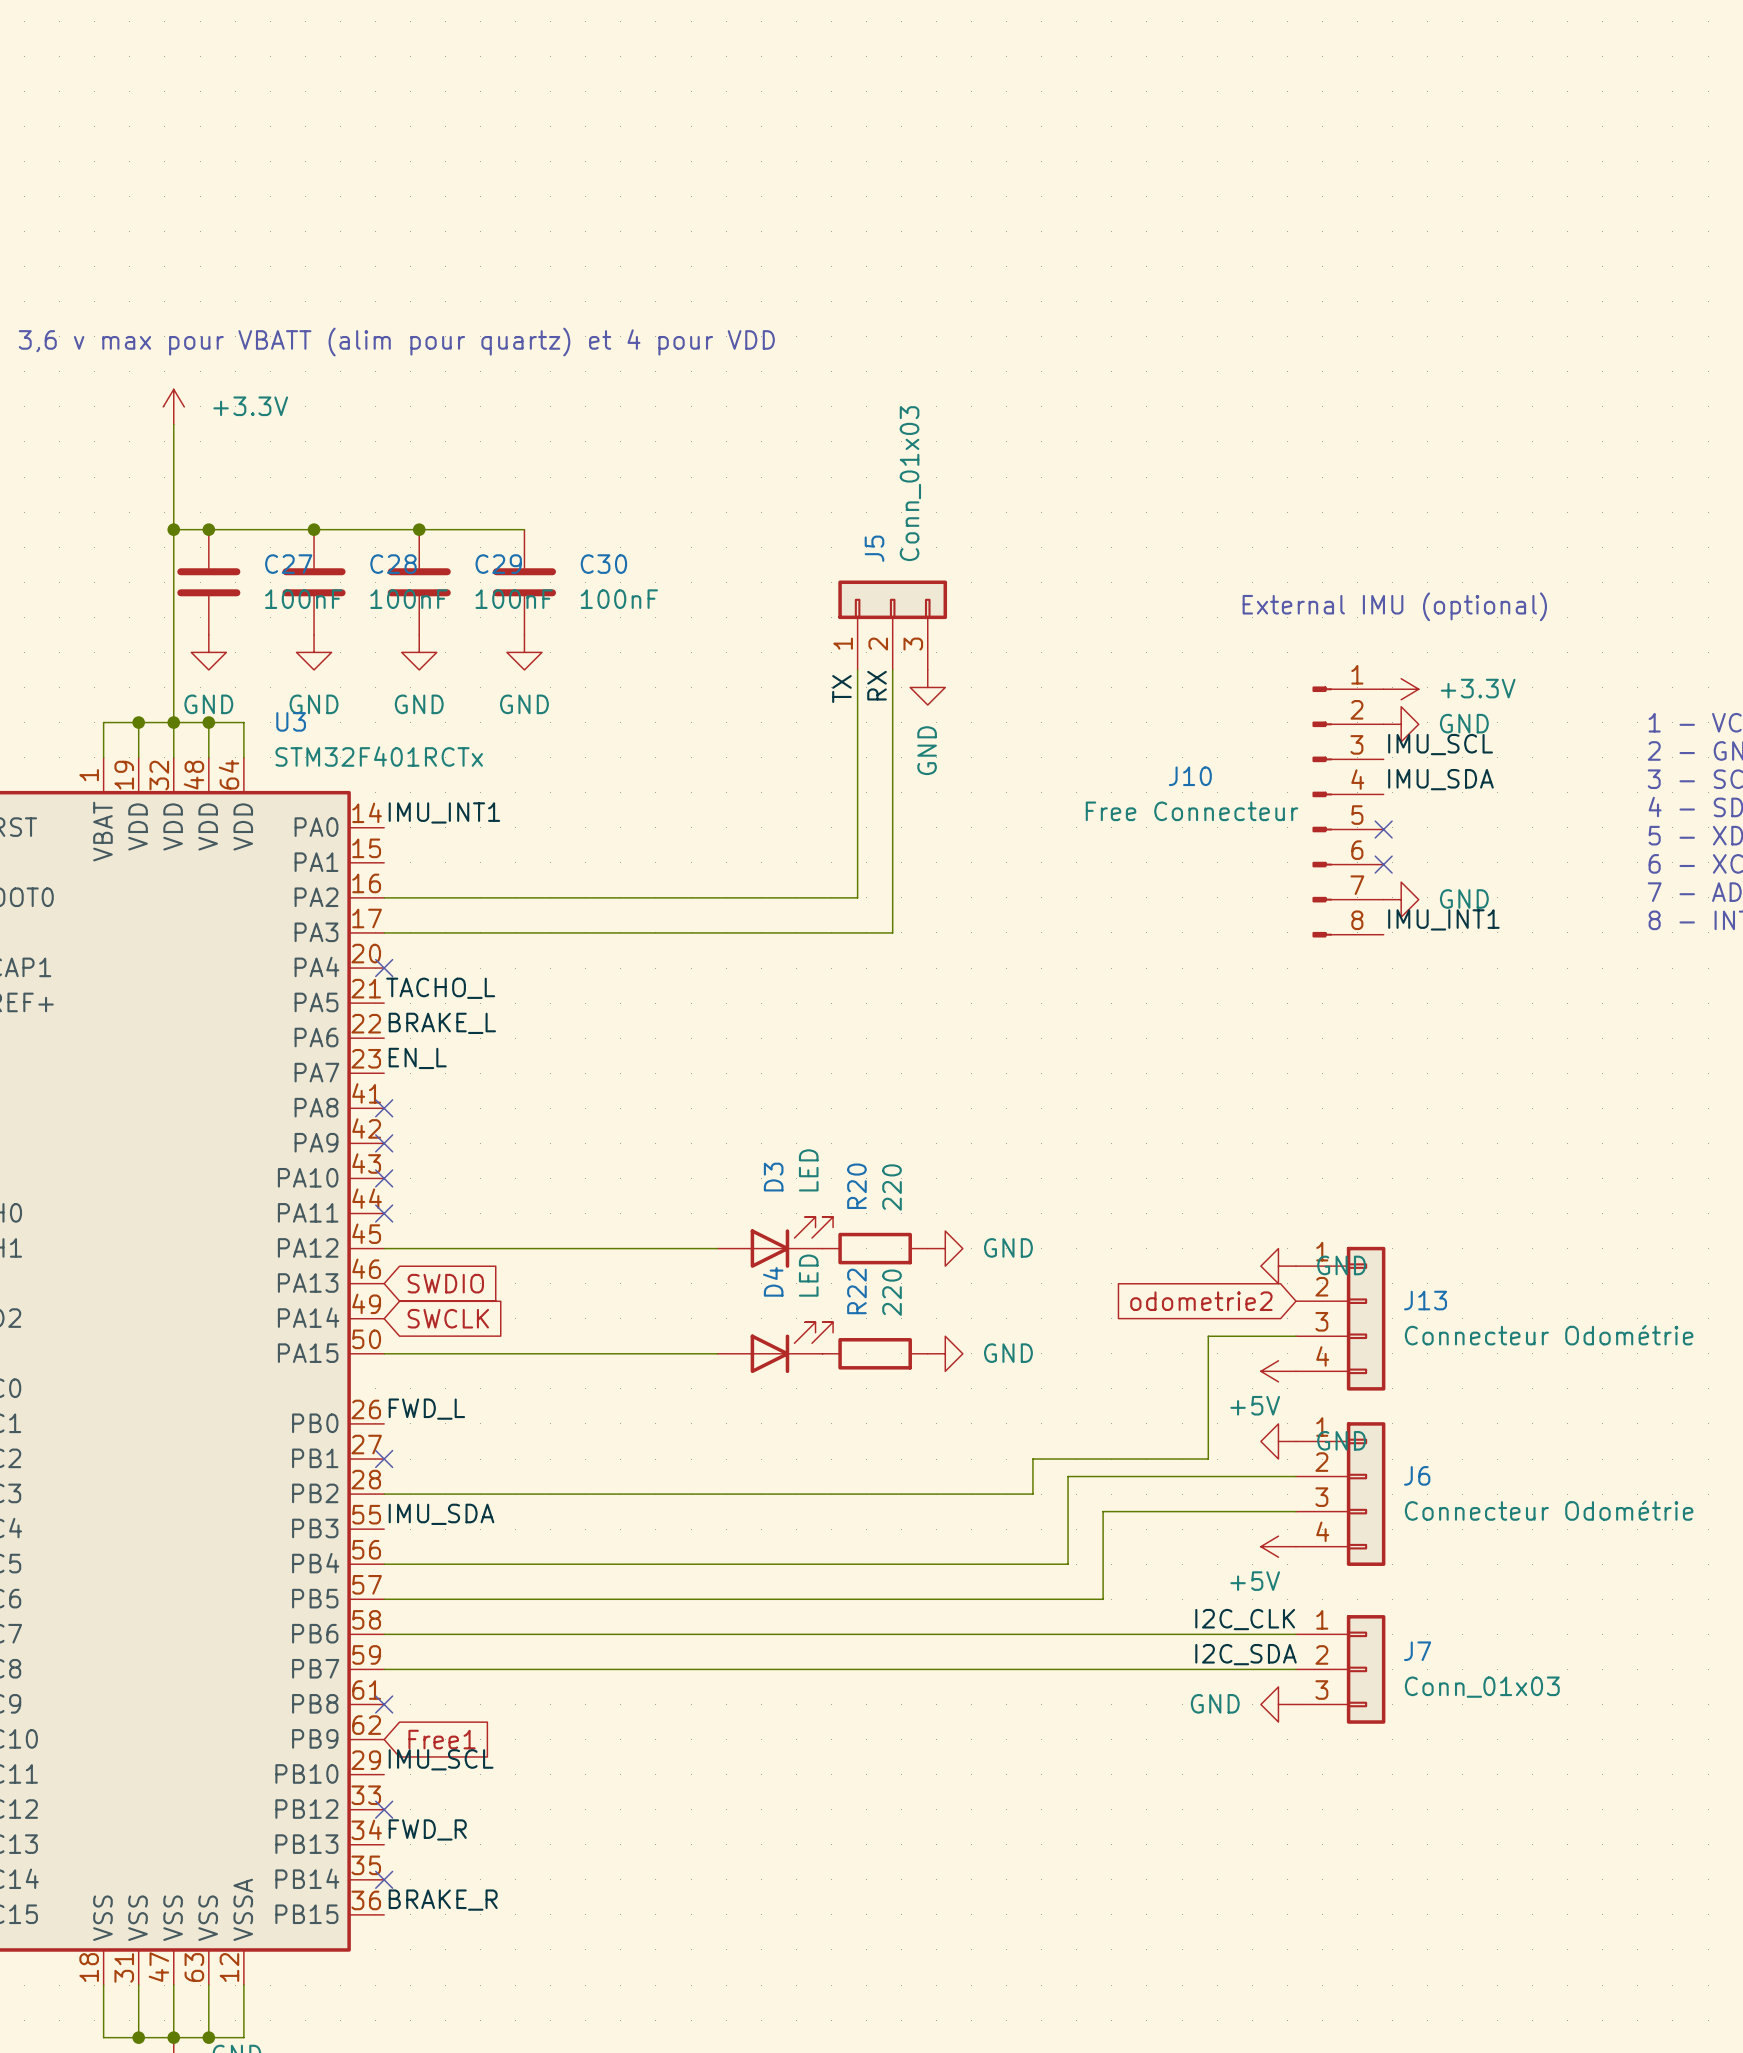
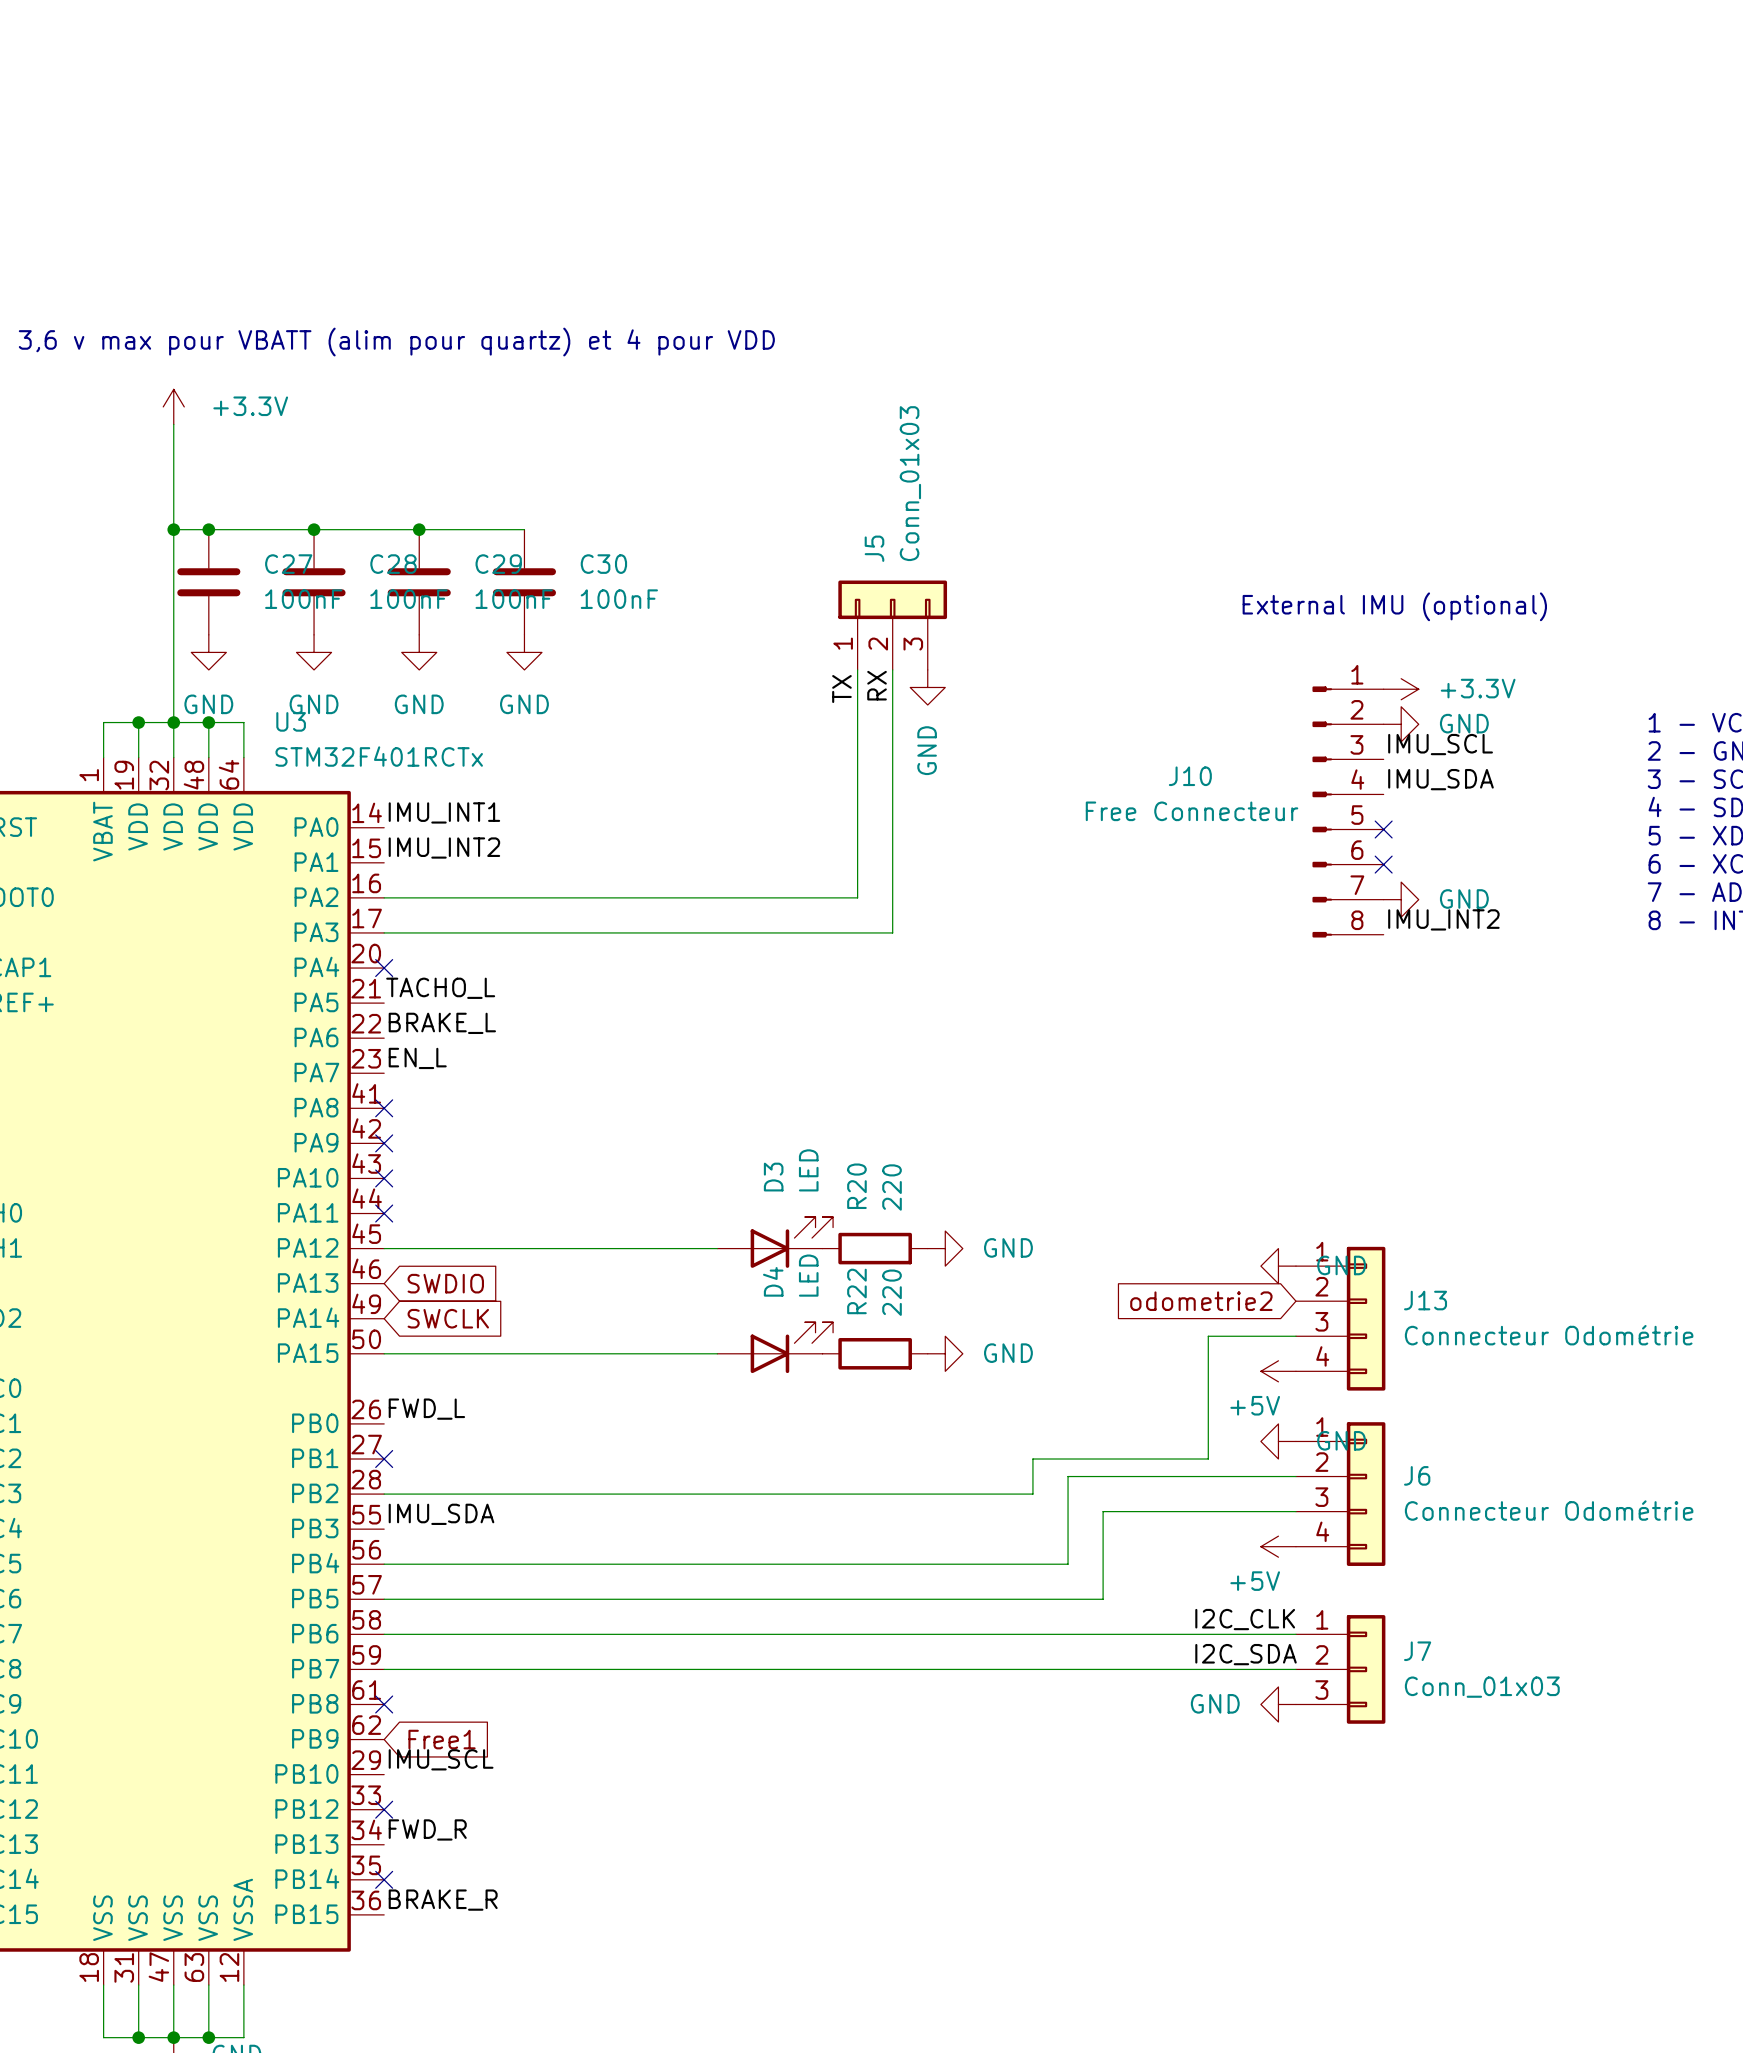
label: none -> IMU_INT2 (444, 848)
label: IMU_INT1 (1443, 919) -> IMU_INT2 (1443, 919)

